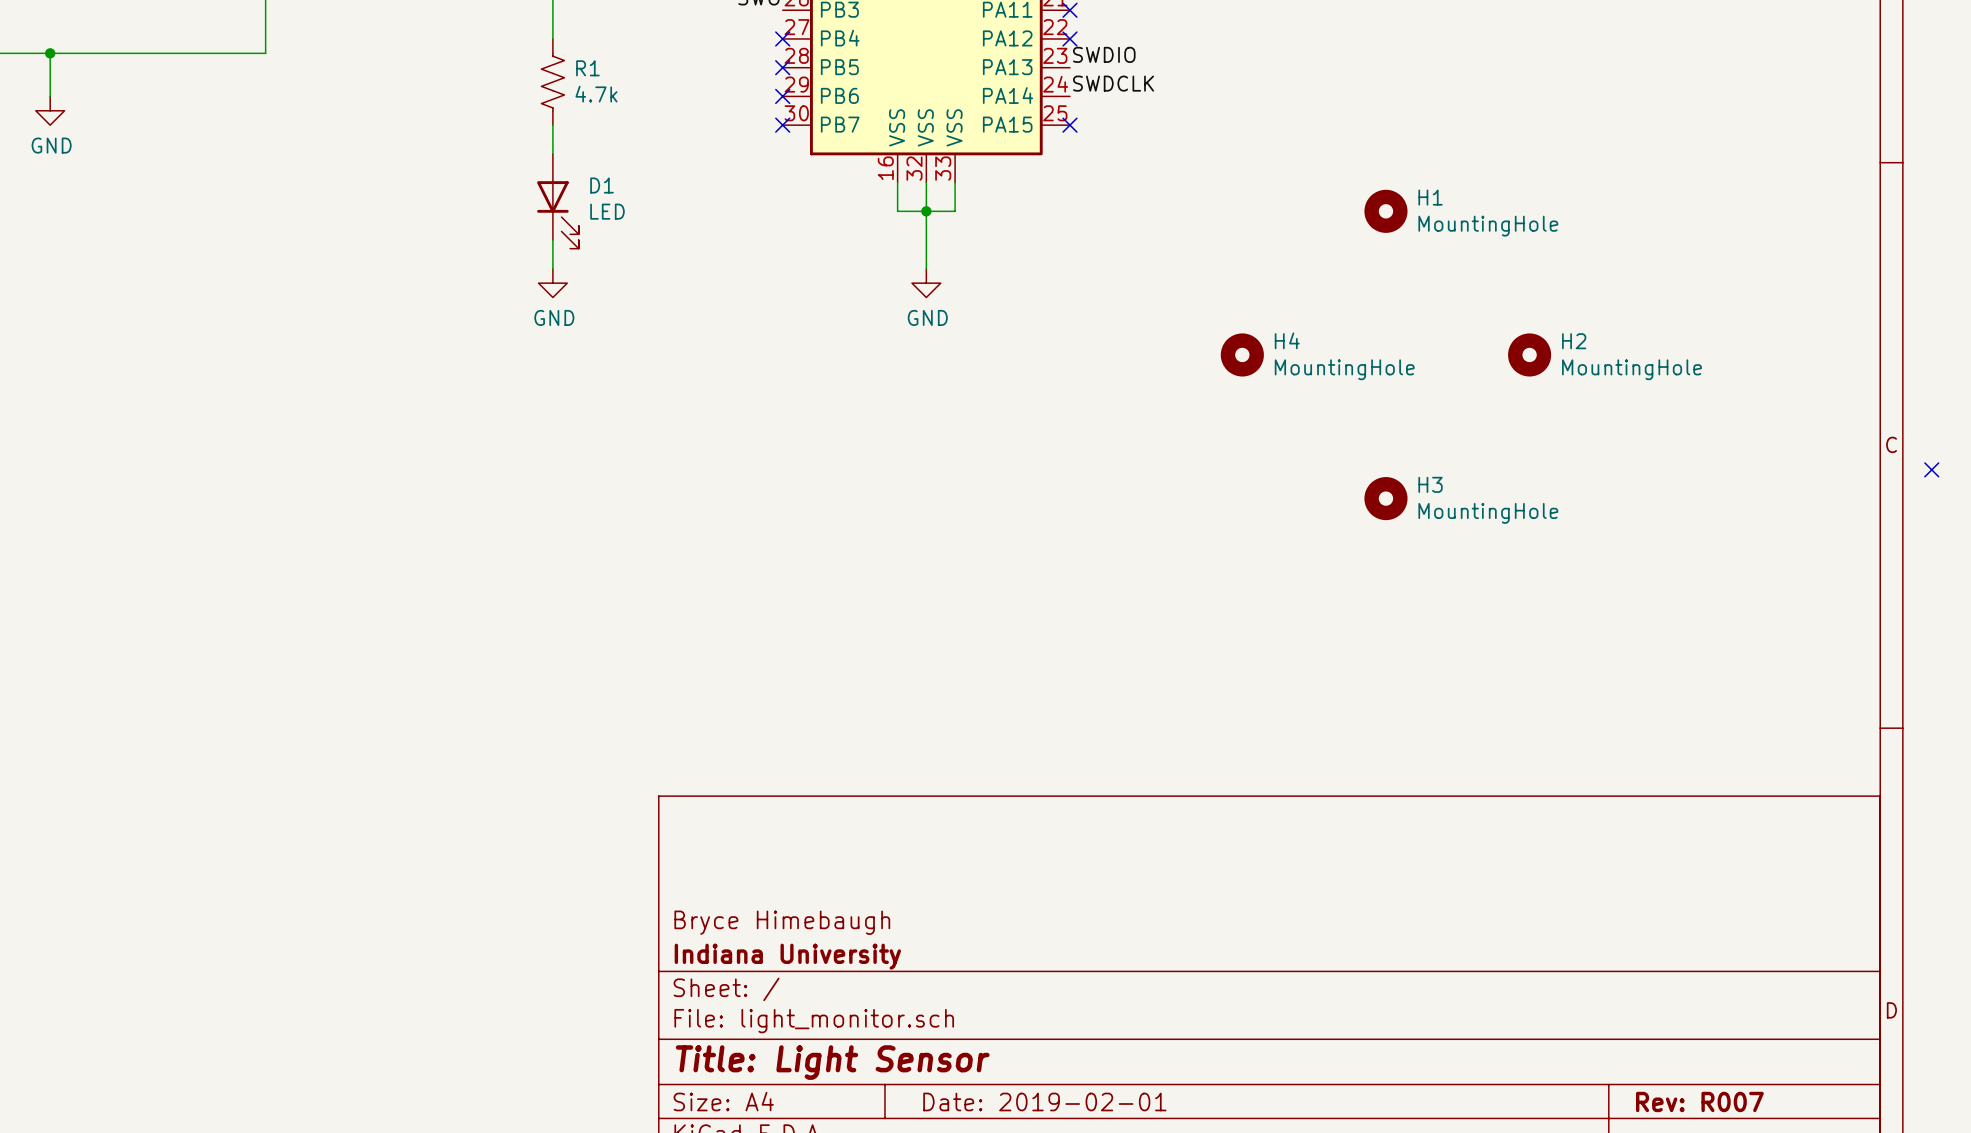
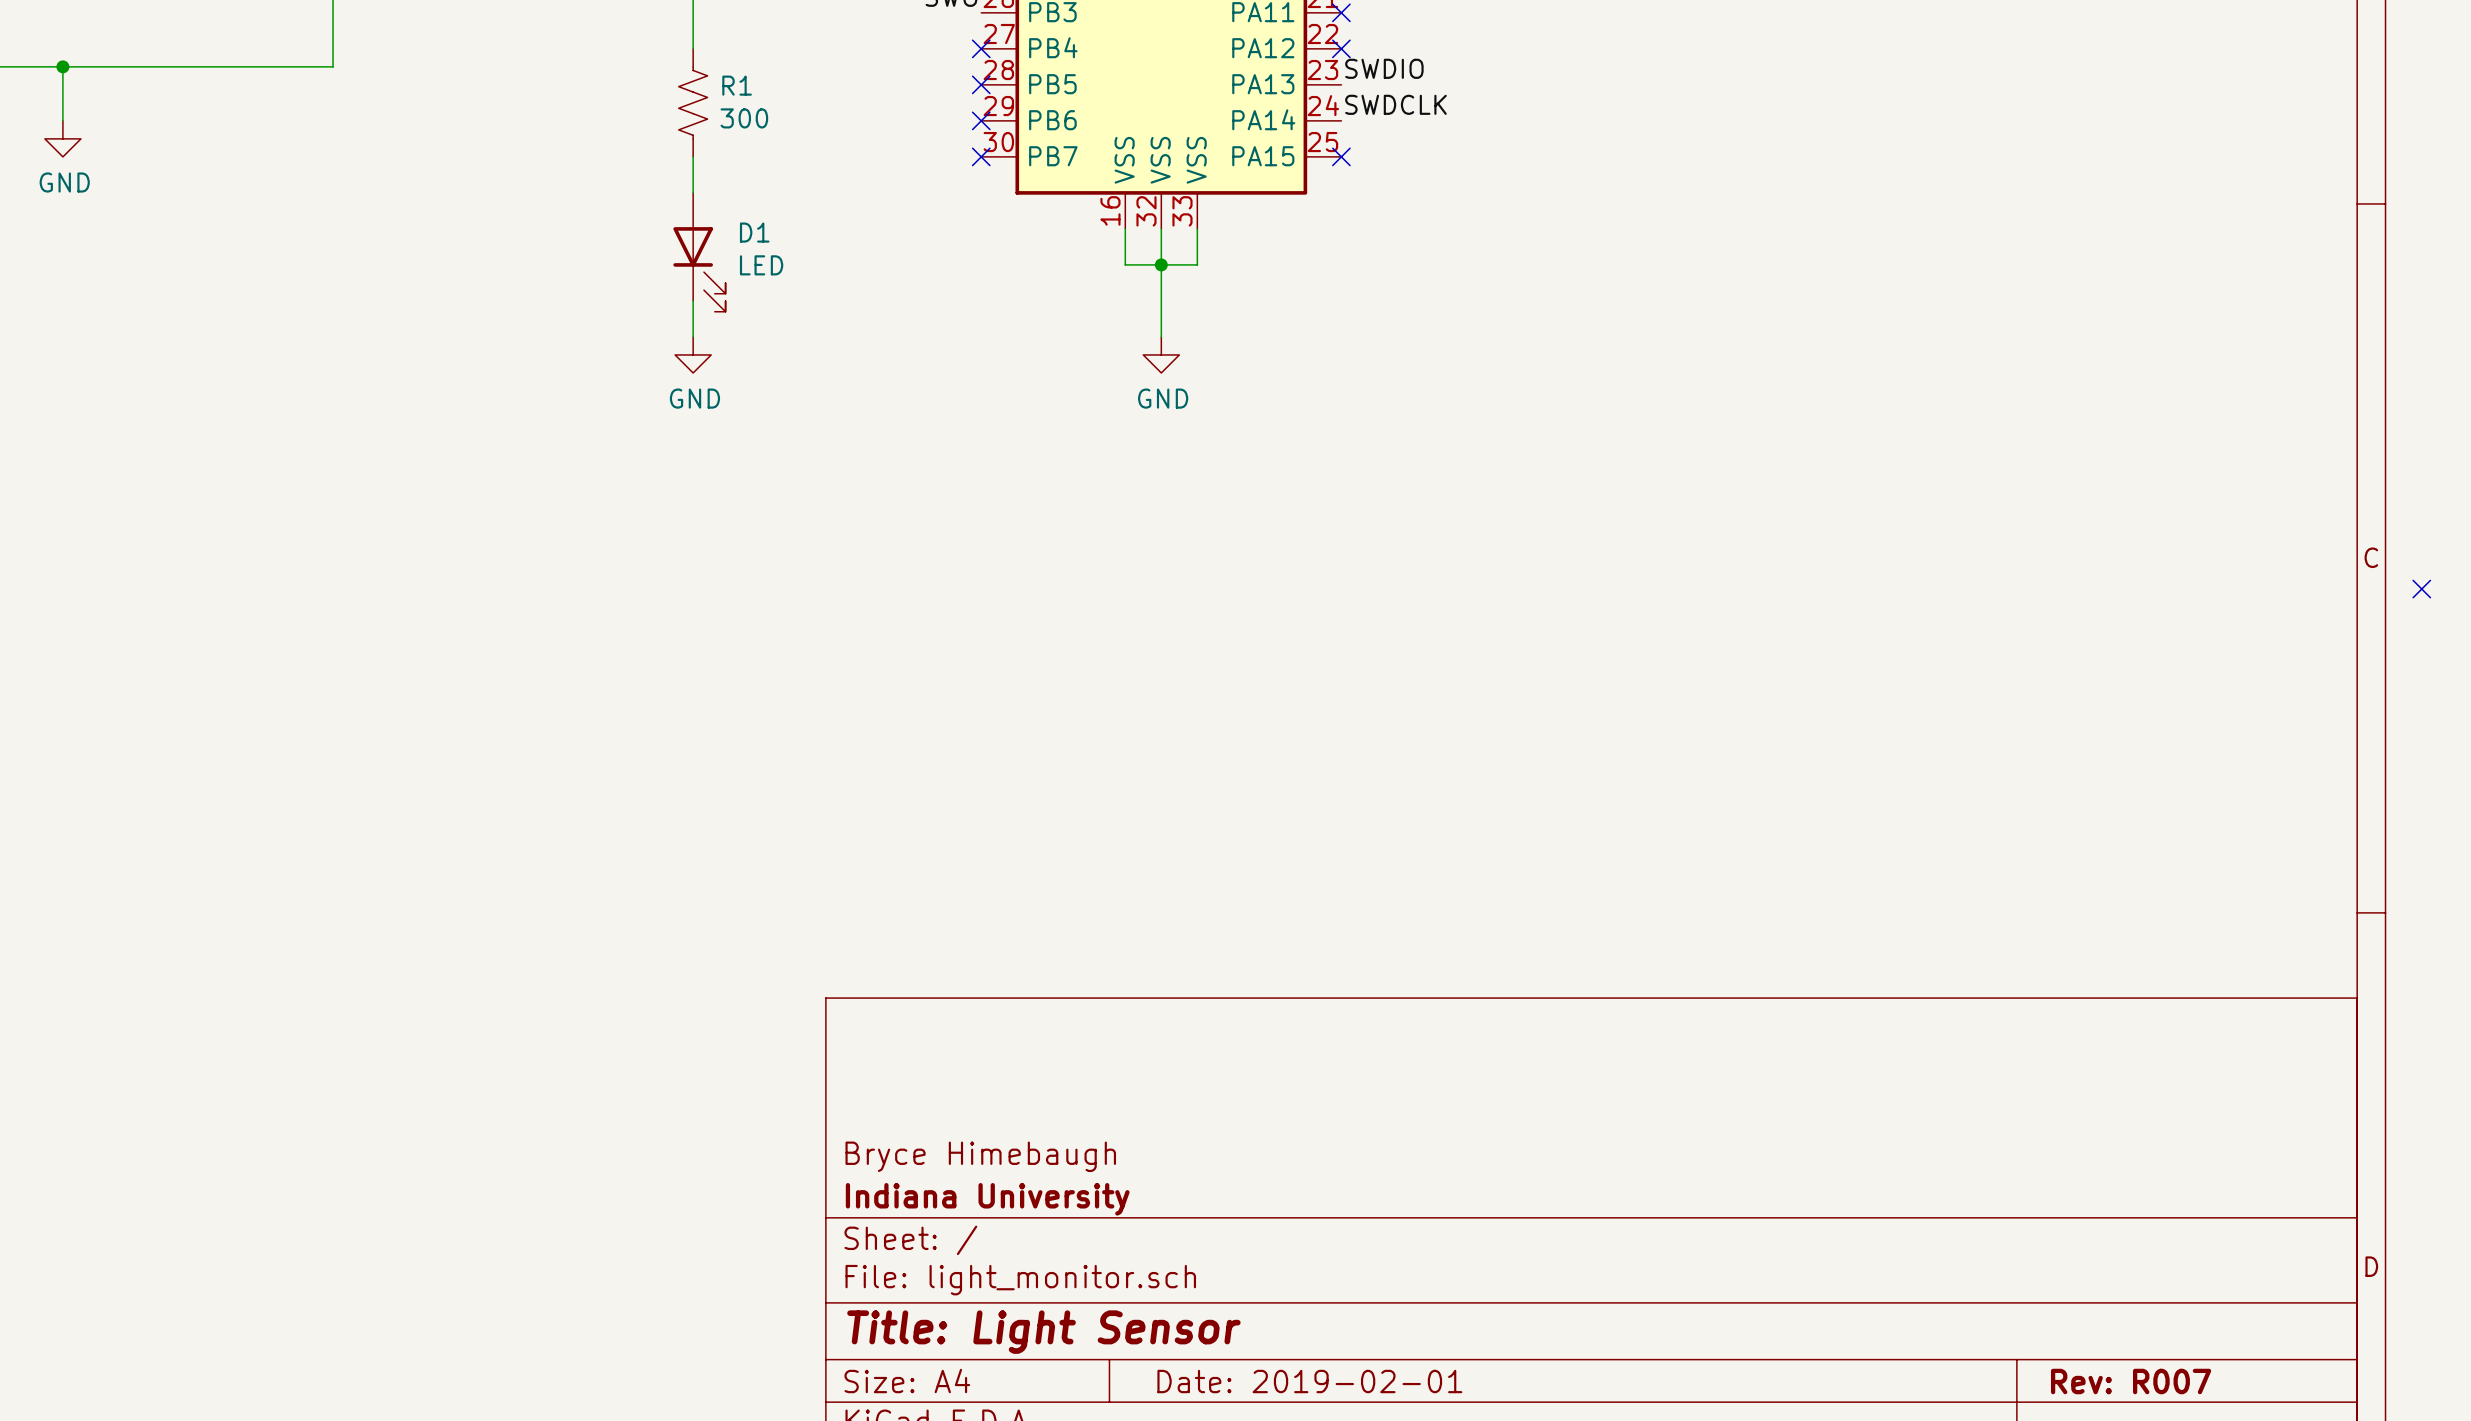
R1 value: 4.7k (596, 94) -> 300 (744, 118)
H1: MountingHole (1385, 211) -> none
H4: MountingHole (1242, 354) -> none
H2: MountingHole (1529, 354) -> none
H3: MountingHole (1385, 498) -> none

